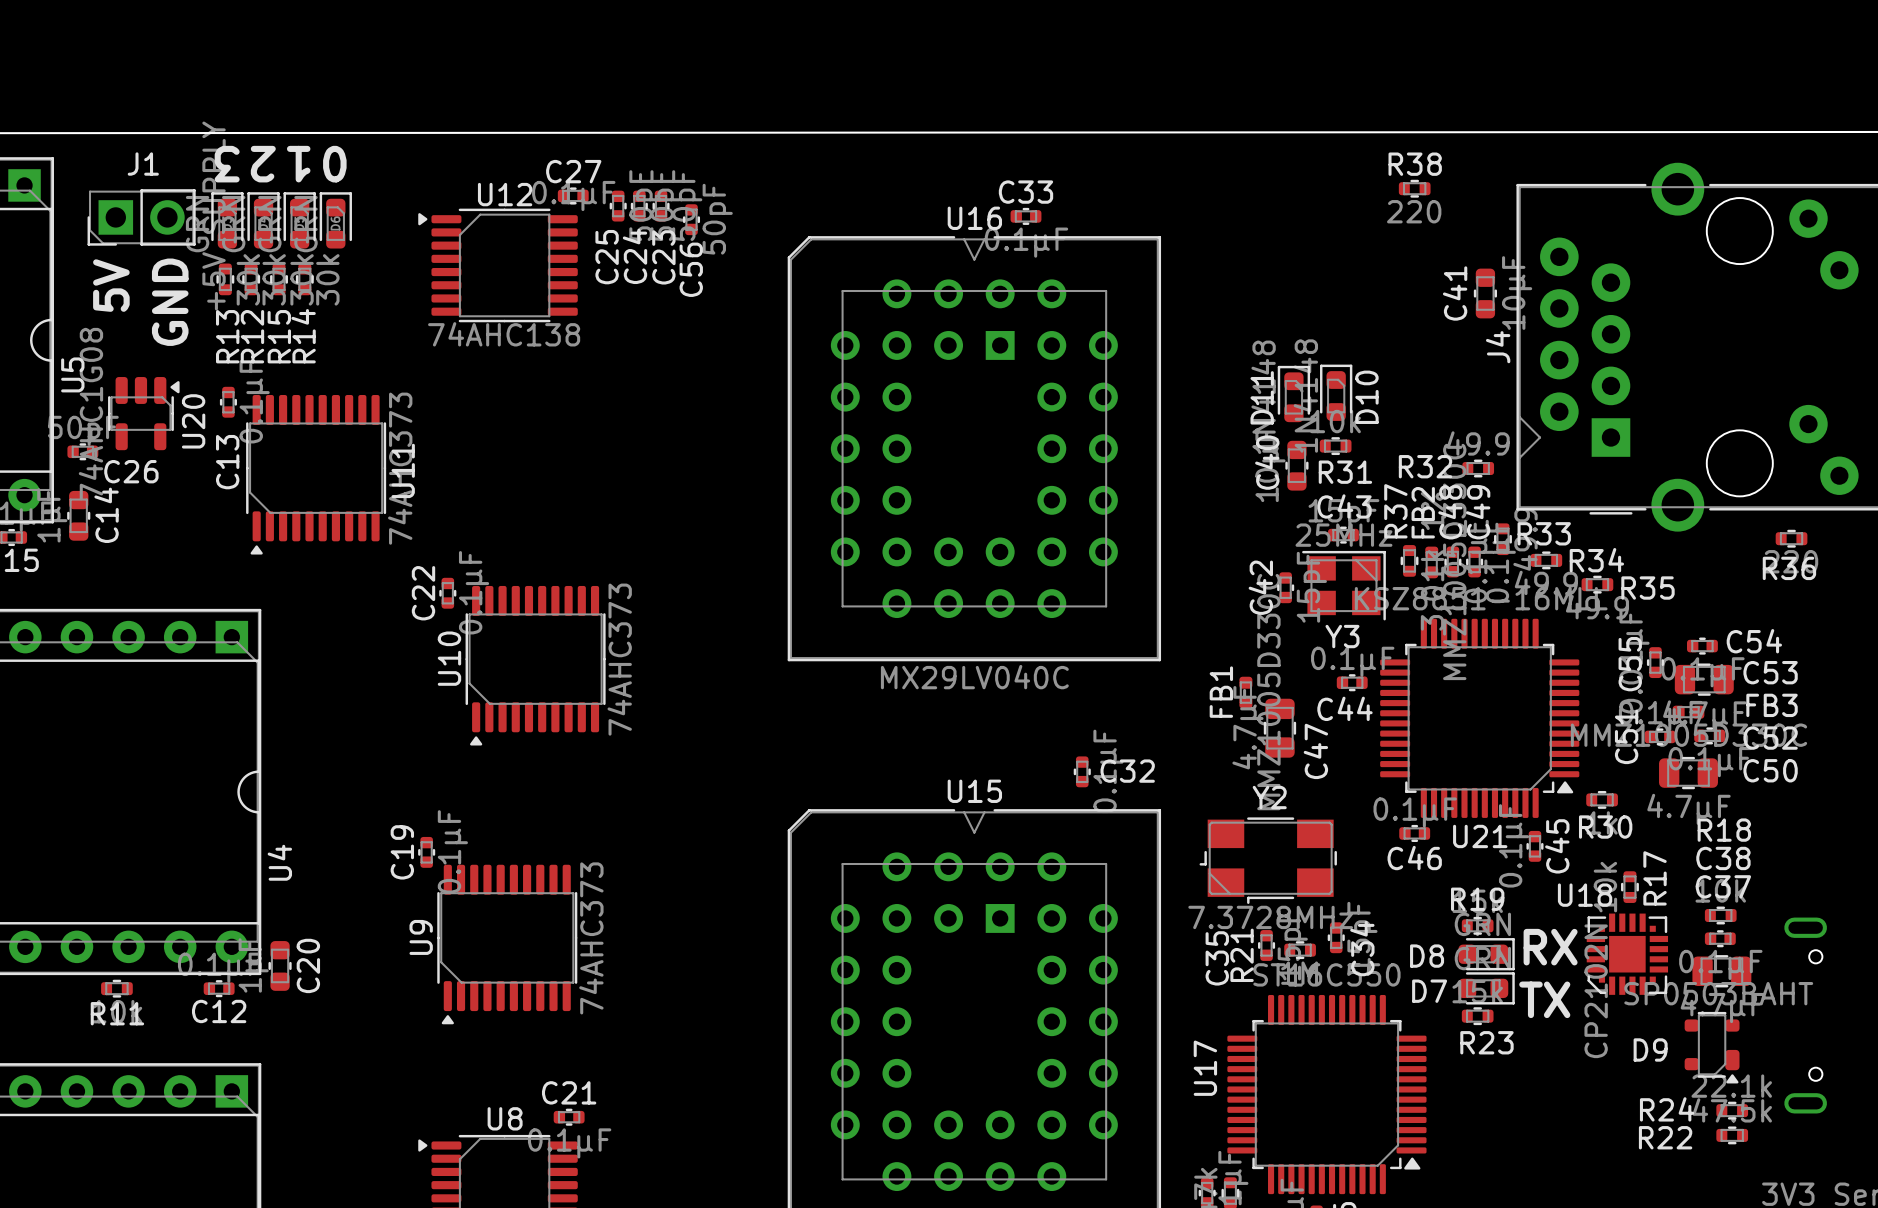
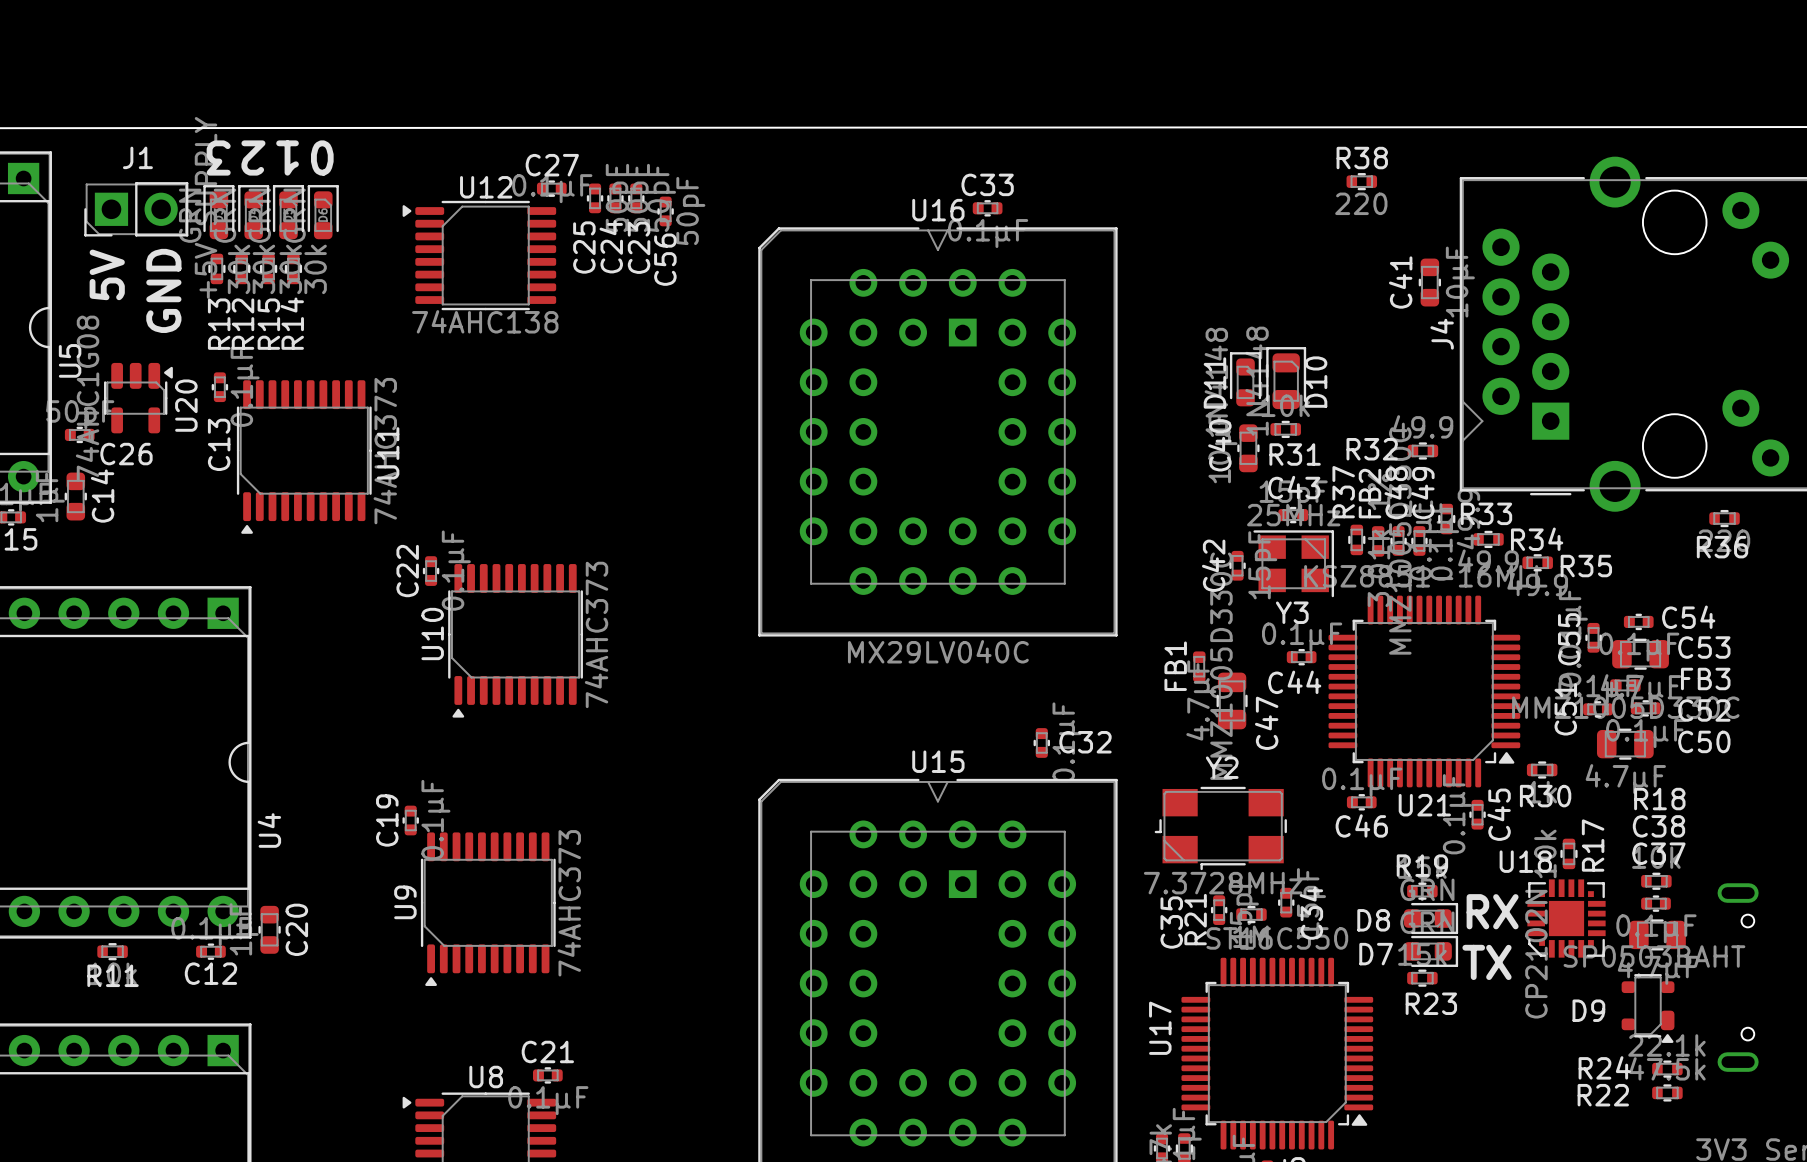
D10 footprint: [1320, 364, 1353, 421] -> [1266, 347, 1307, 410]

